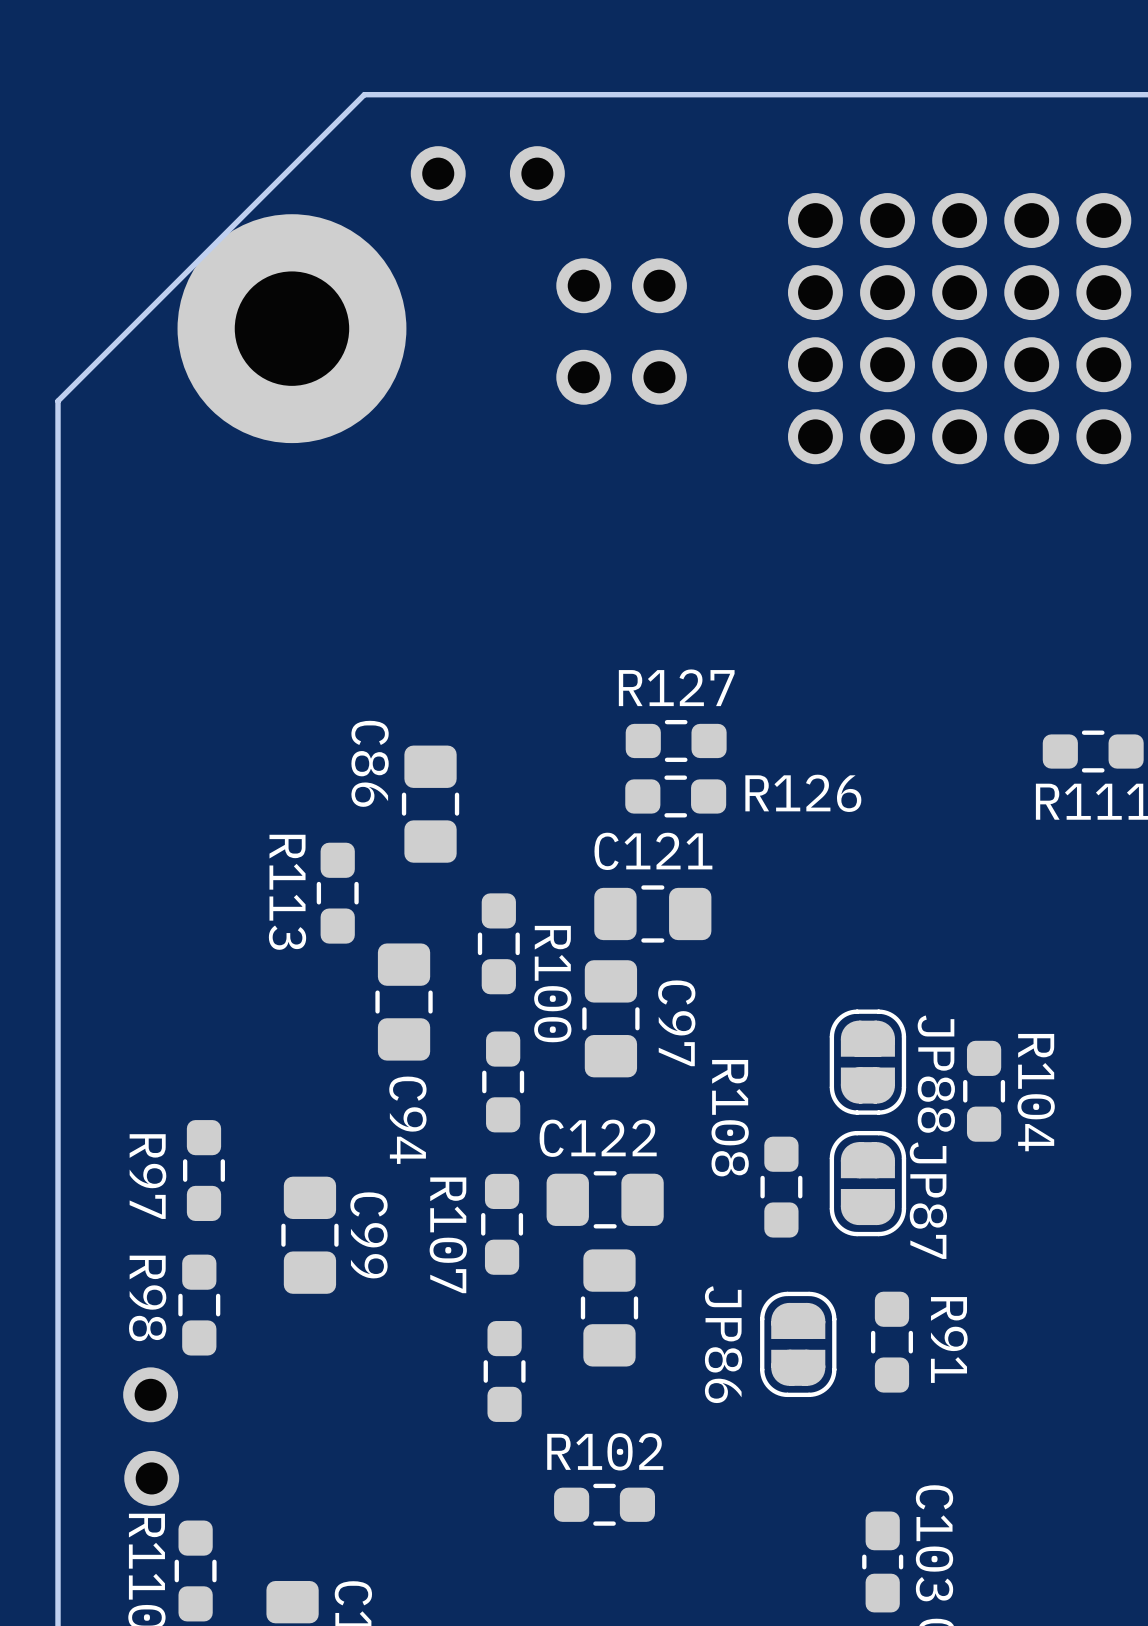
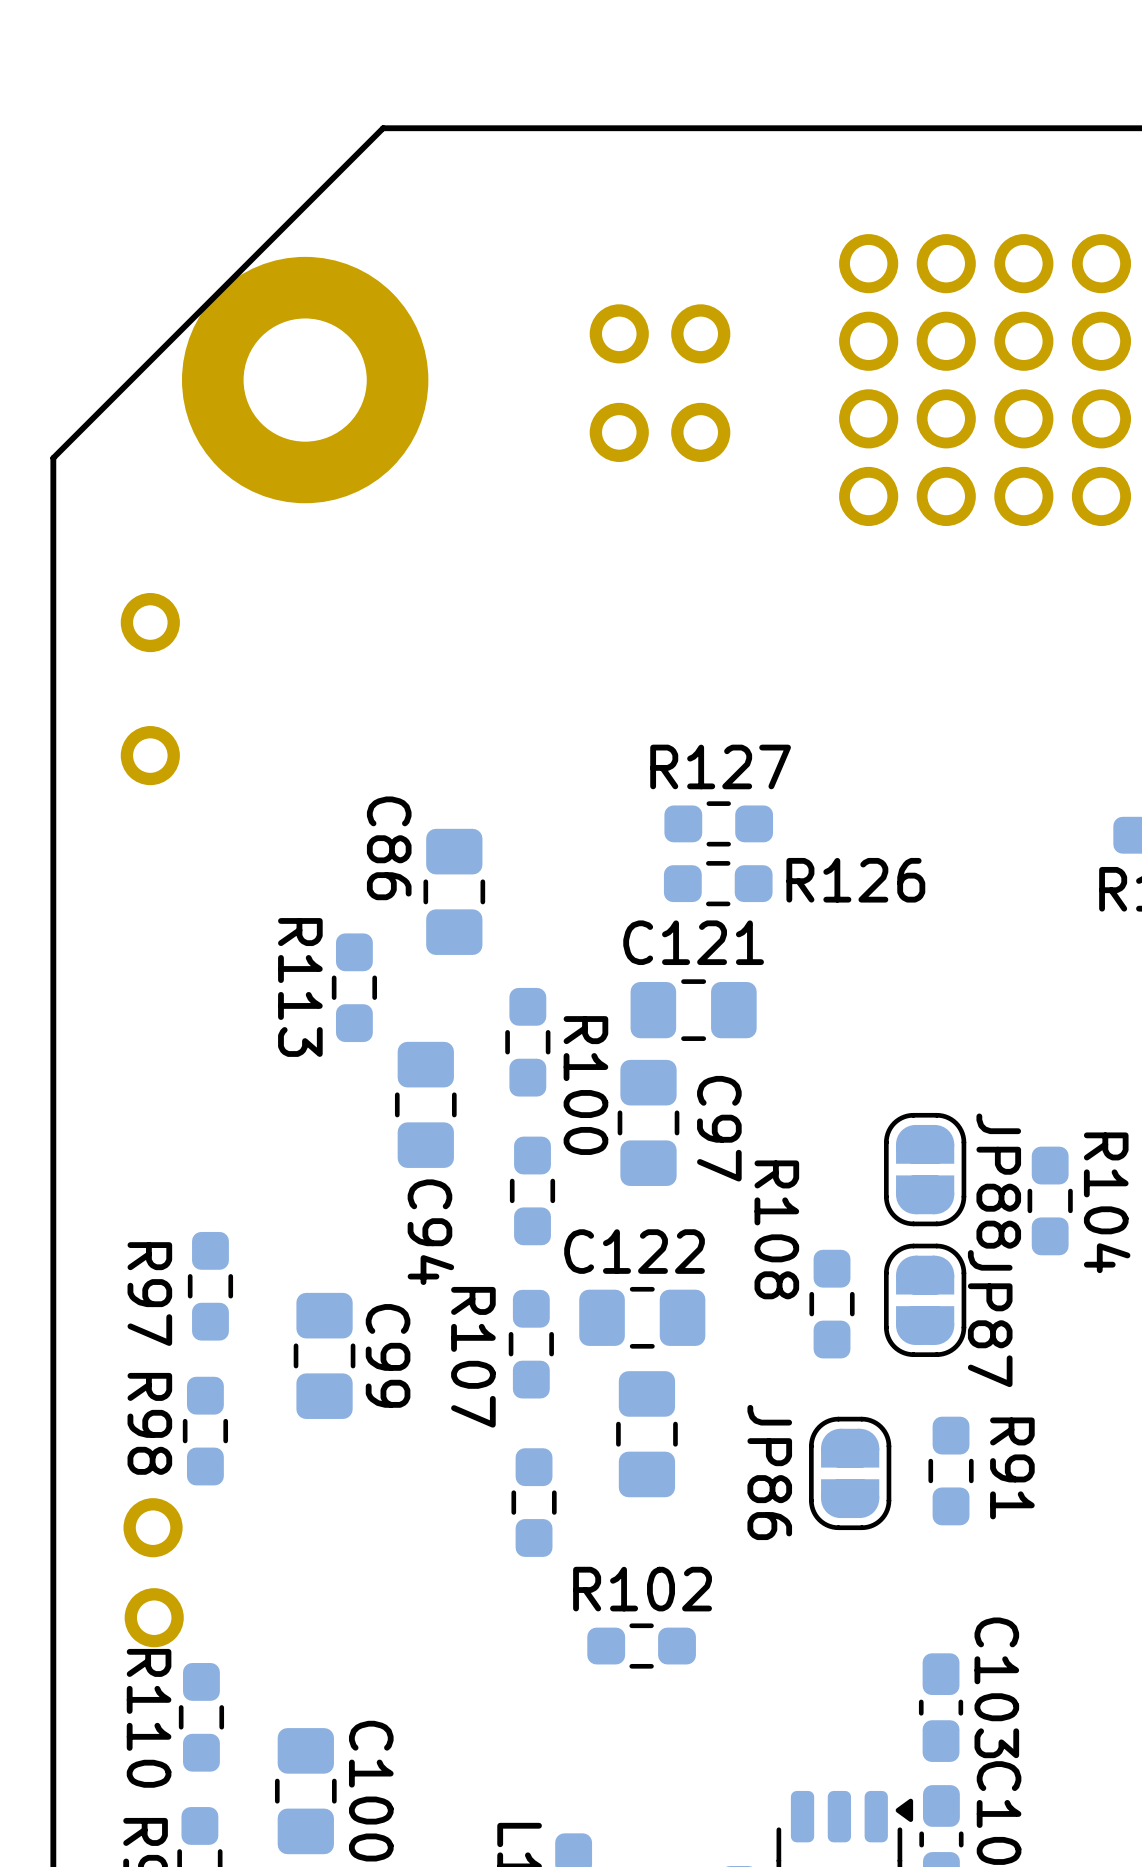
part: (438, 173) -> none
part: (537, 173) -> none
part: none -> (150, 622)
part: none -> (150, 755)

